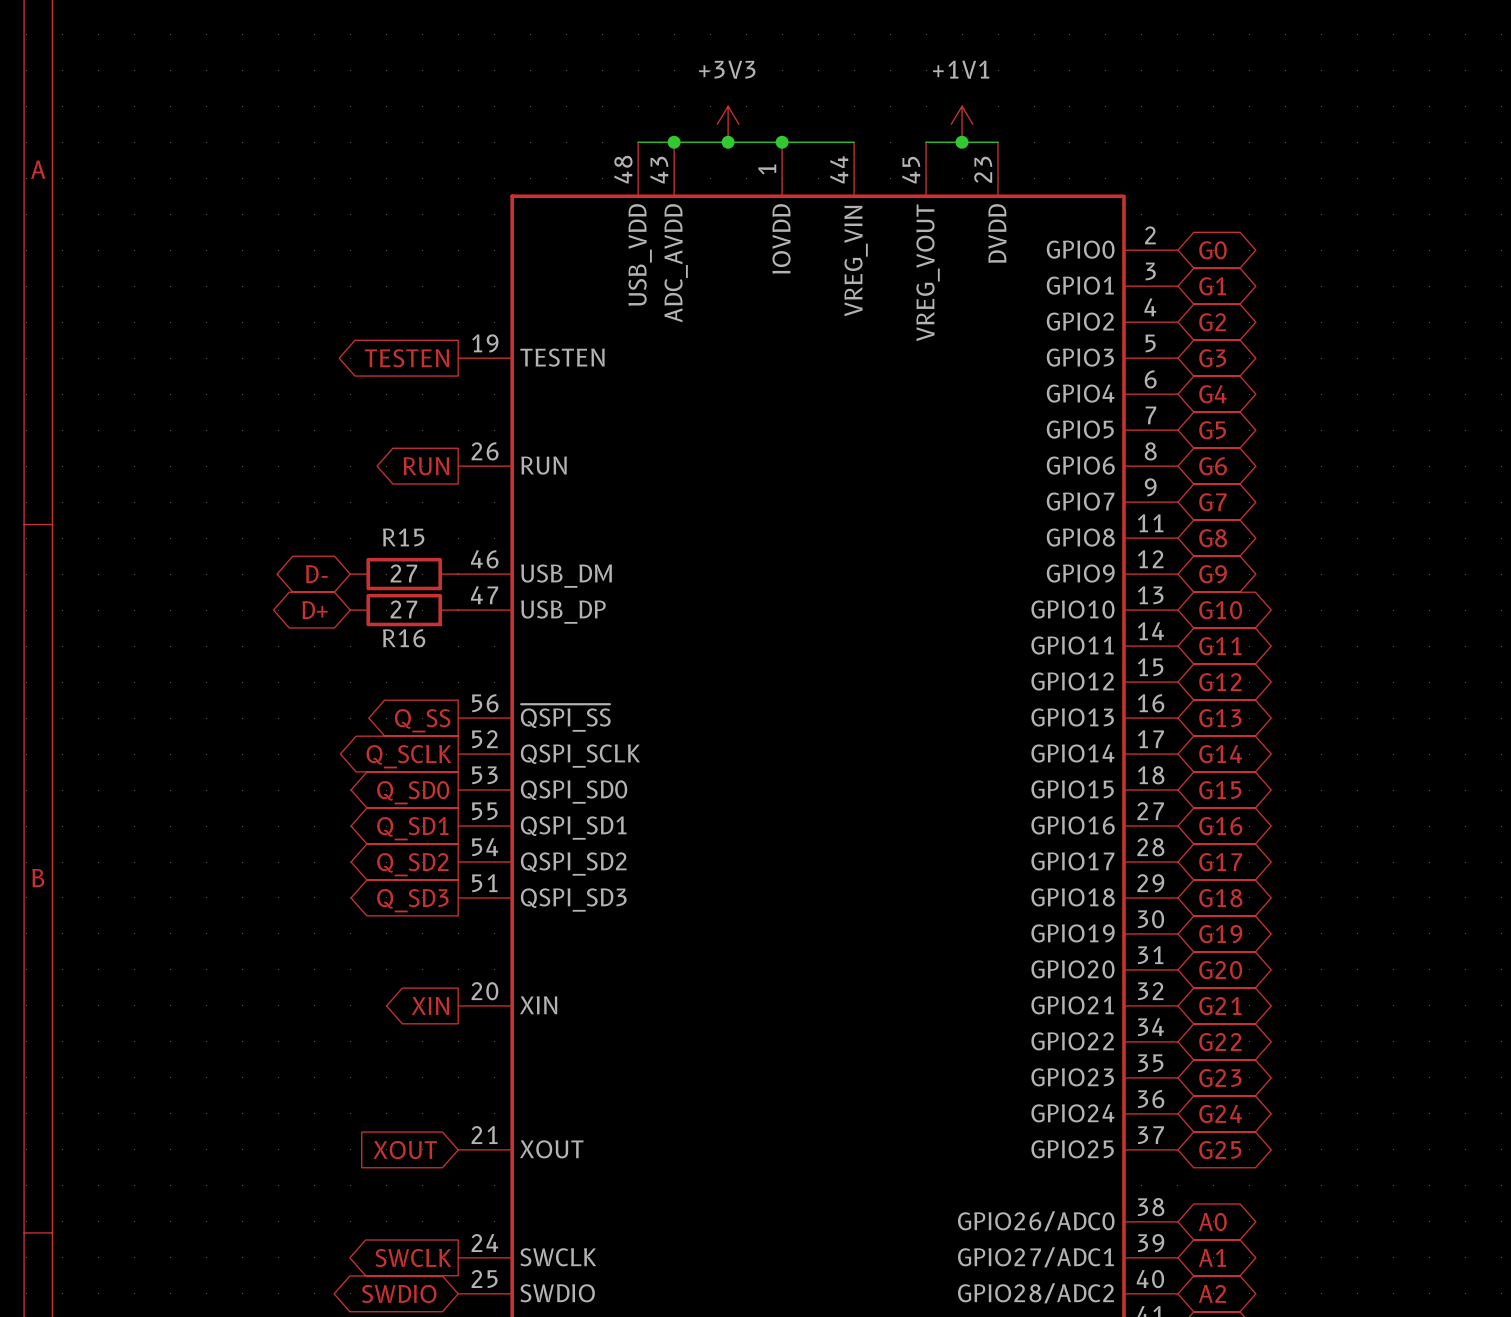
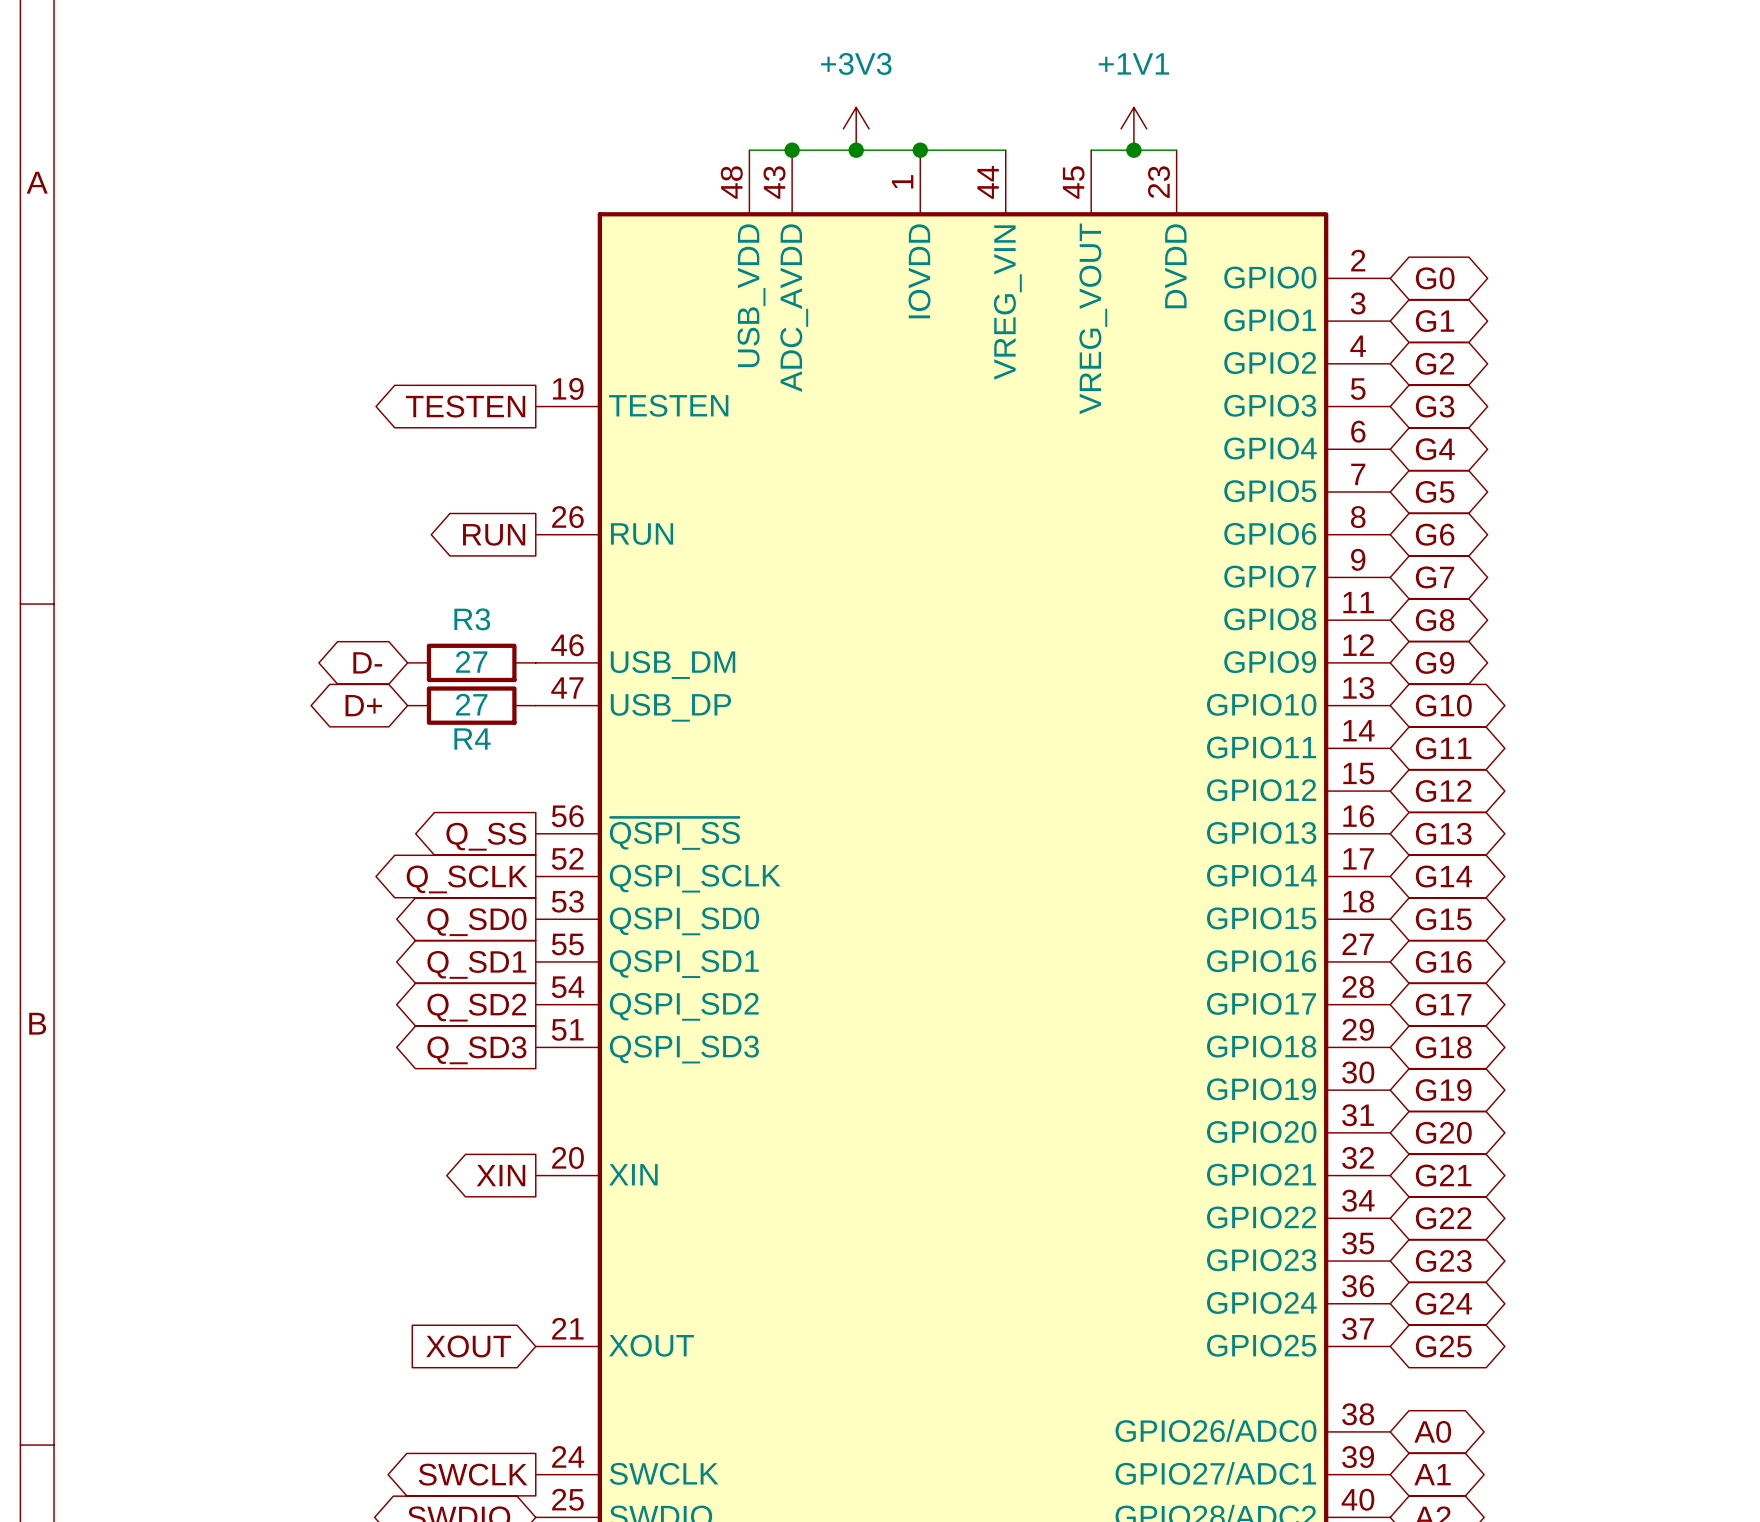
R15 name: R15 (403, 537) -> R3 (472, 619)
R16 name: R16 (404, 638) -> R4 (472, 739)

